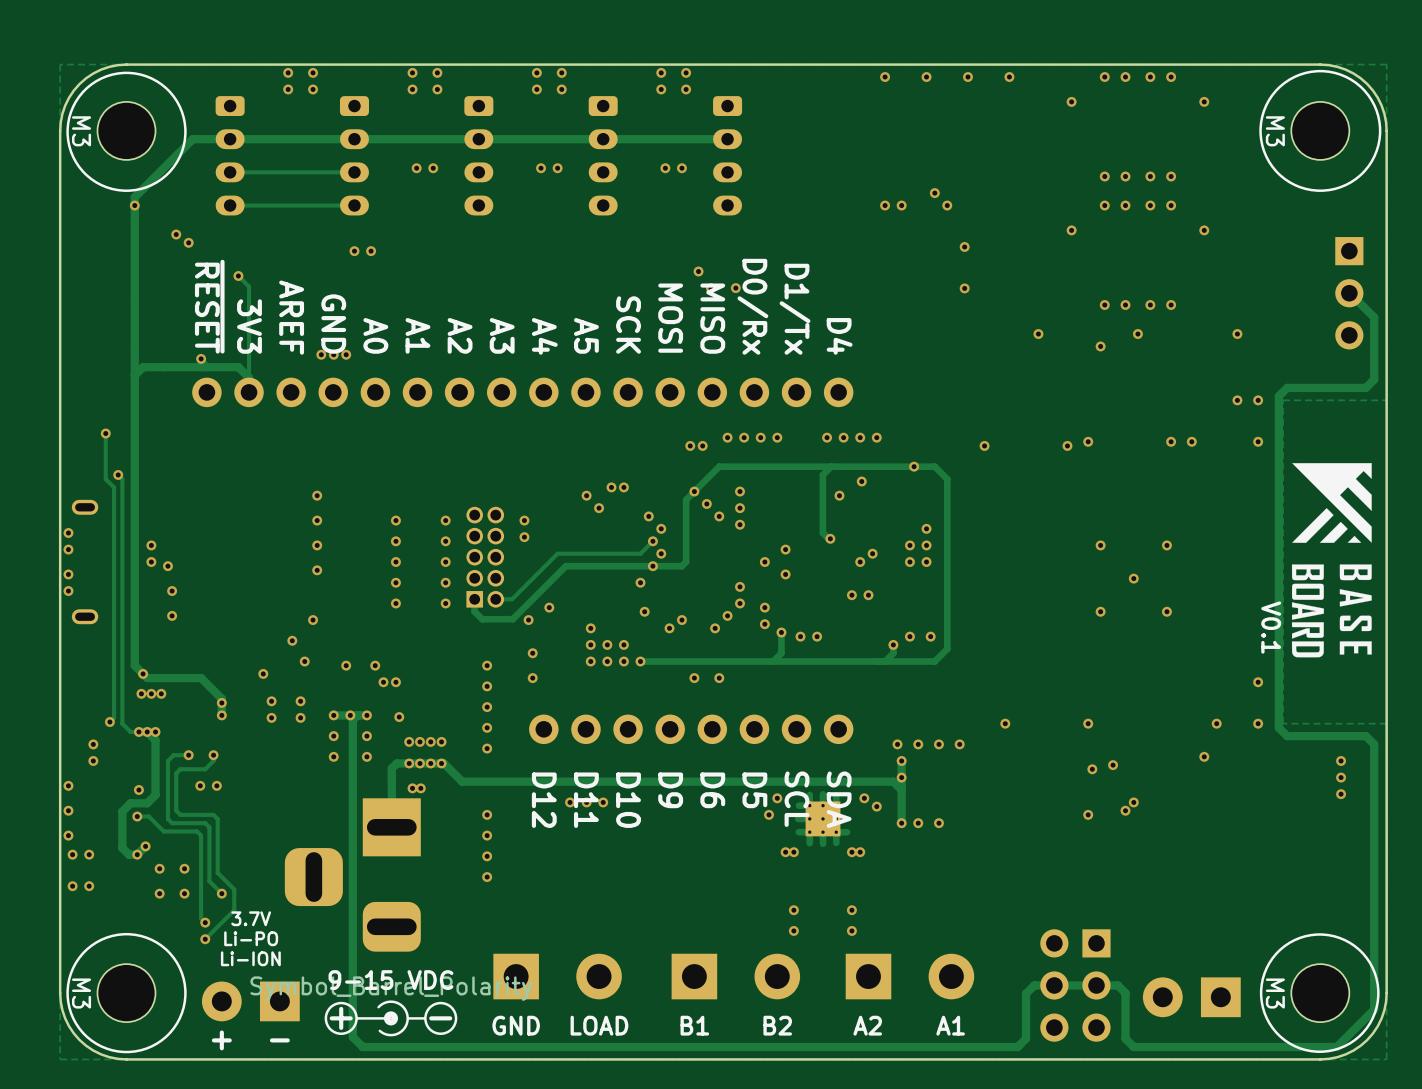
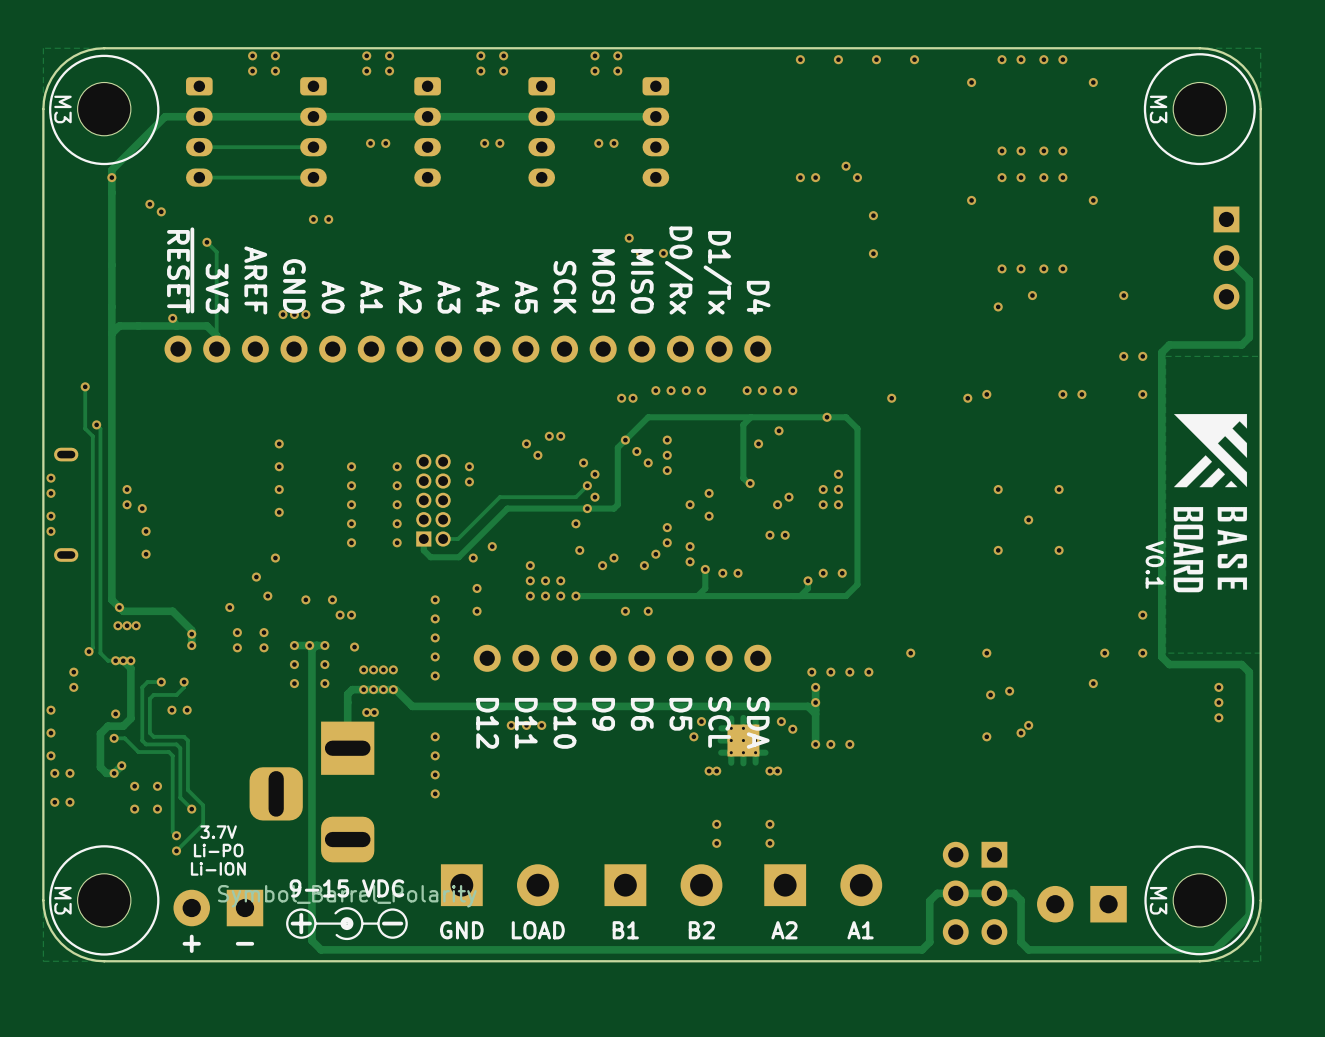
via: (1038, 334) -> none

